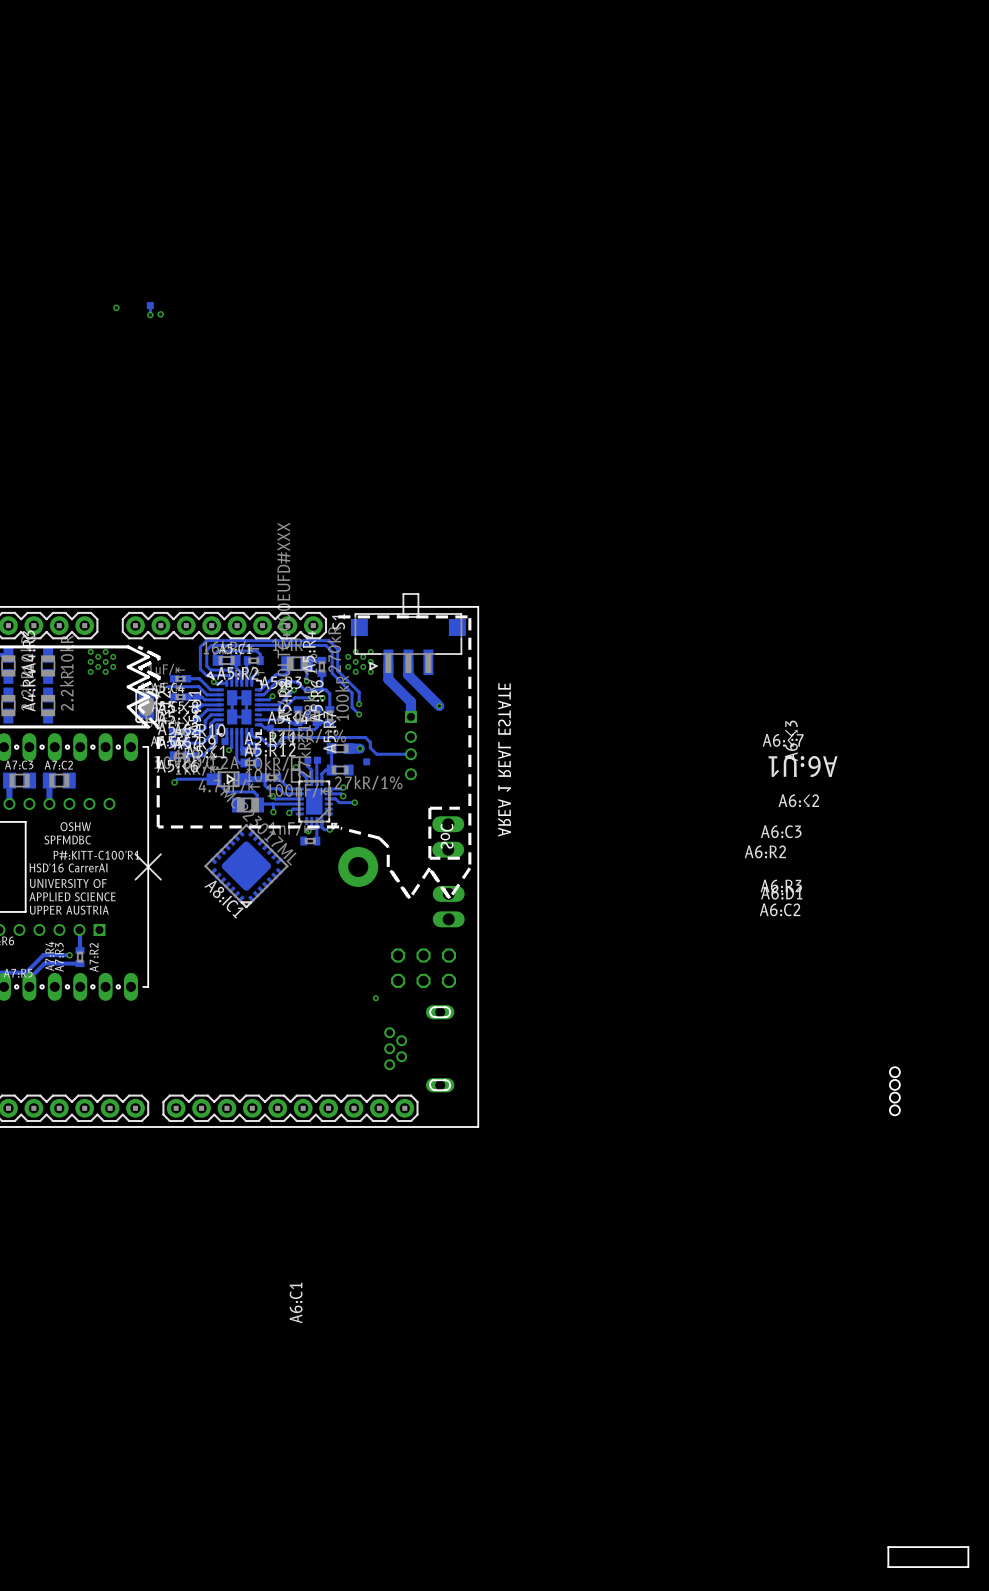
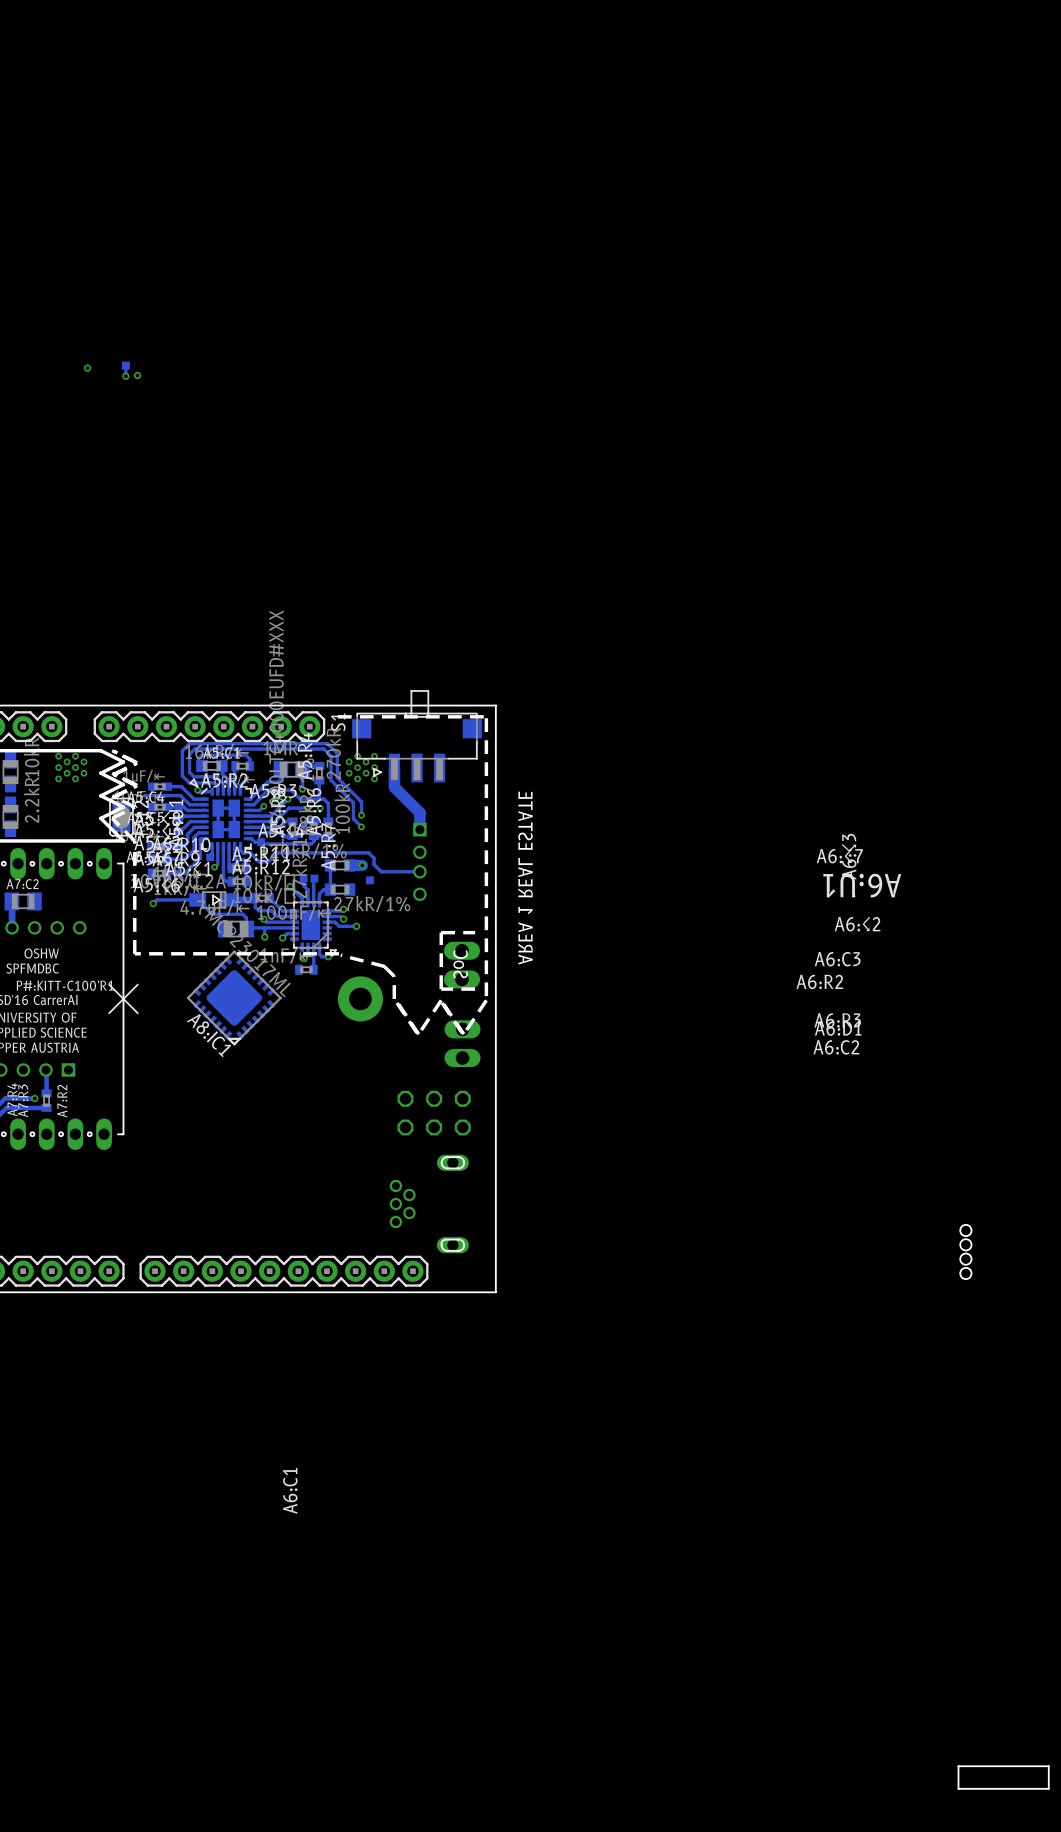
track: (408, 662) (408, 675) (439, 706) -> none
via: (439, 706) -> none
track: none -> (292, 821) (285, 821) (279, 827) (247, 827)
via: (375, 998) -> none

